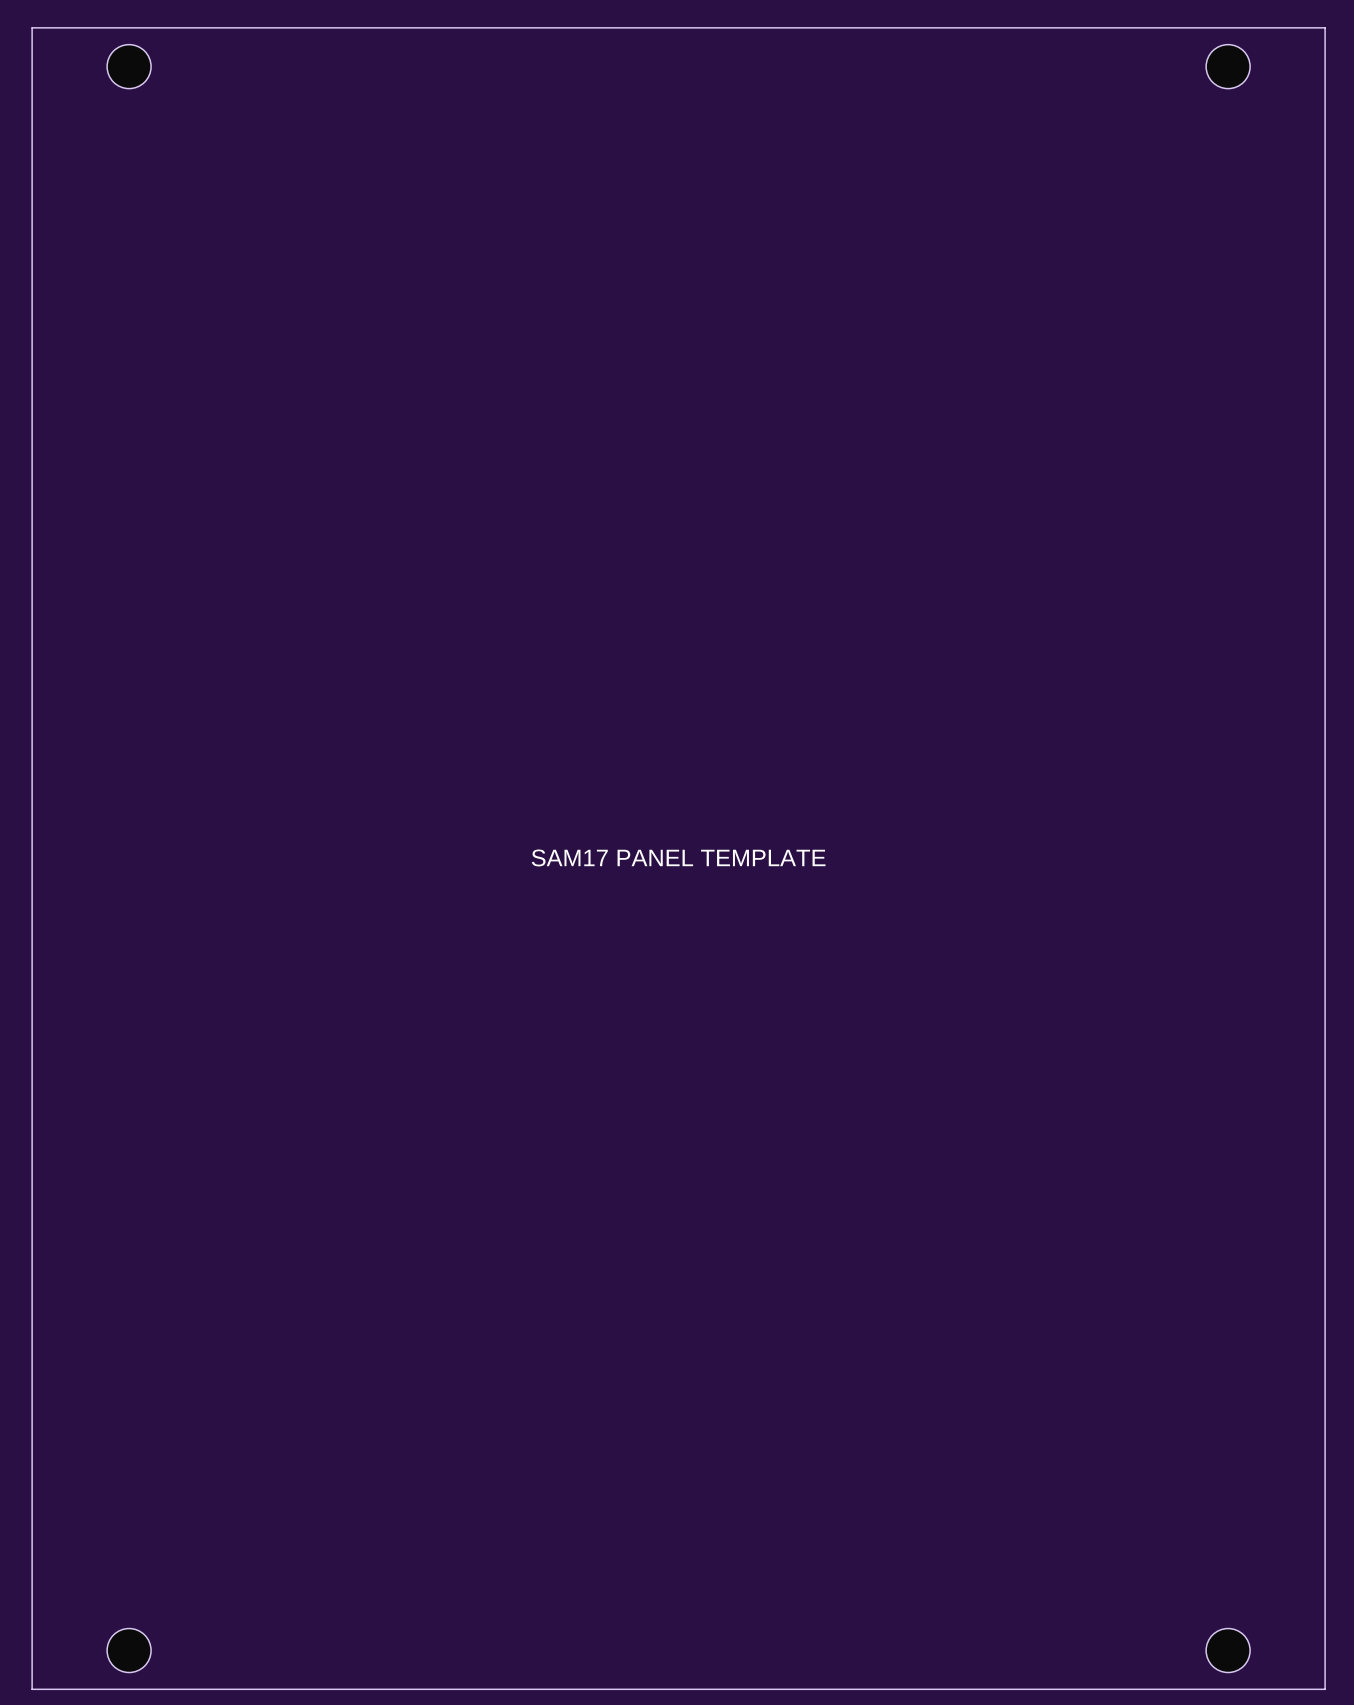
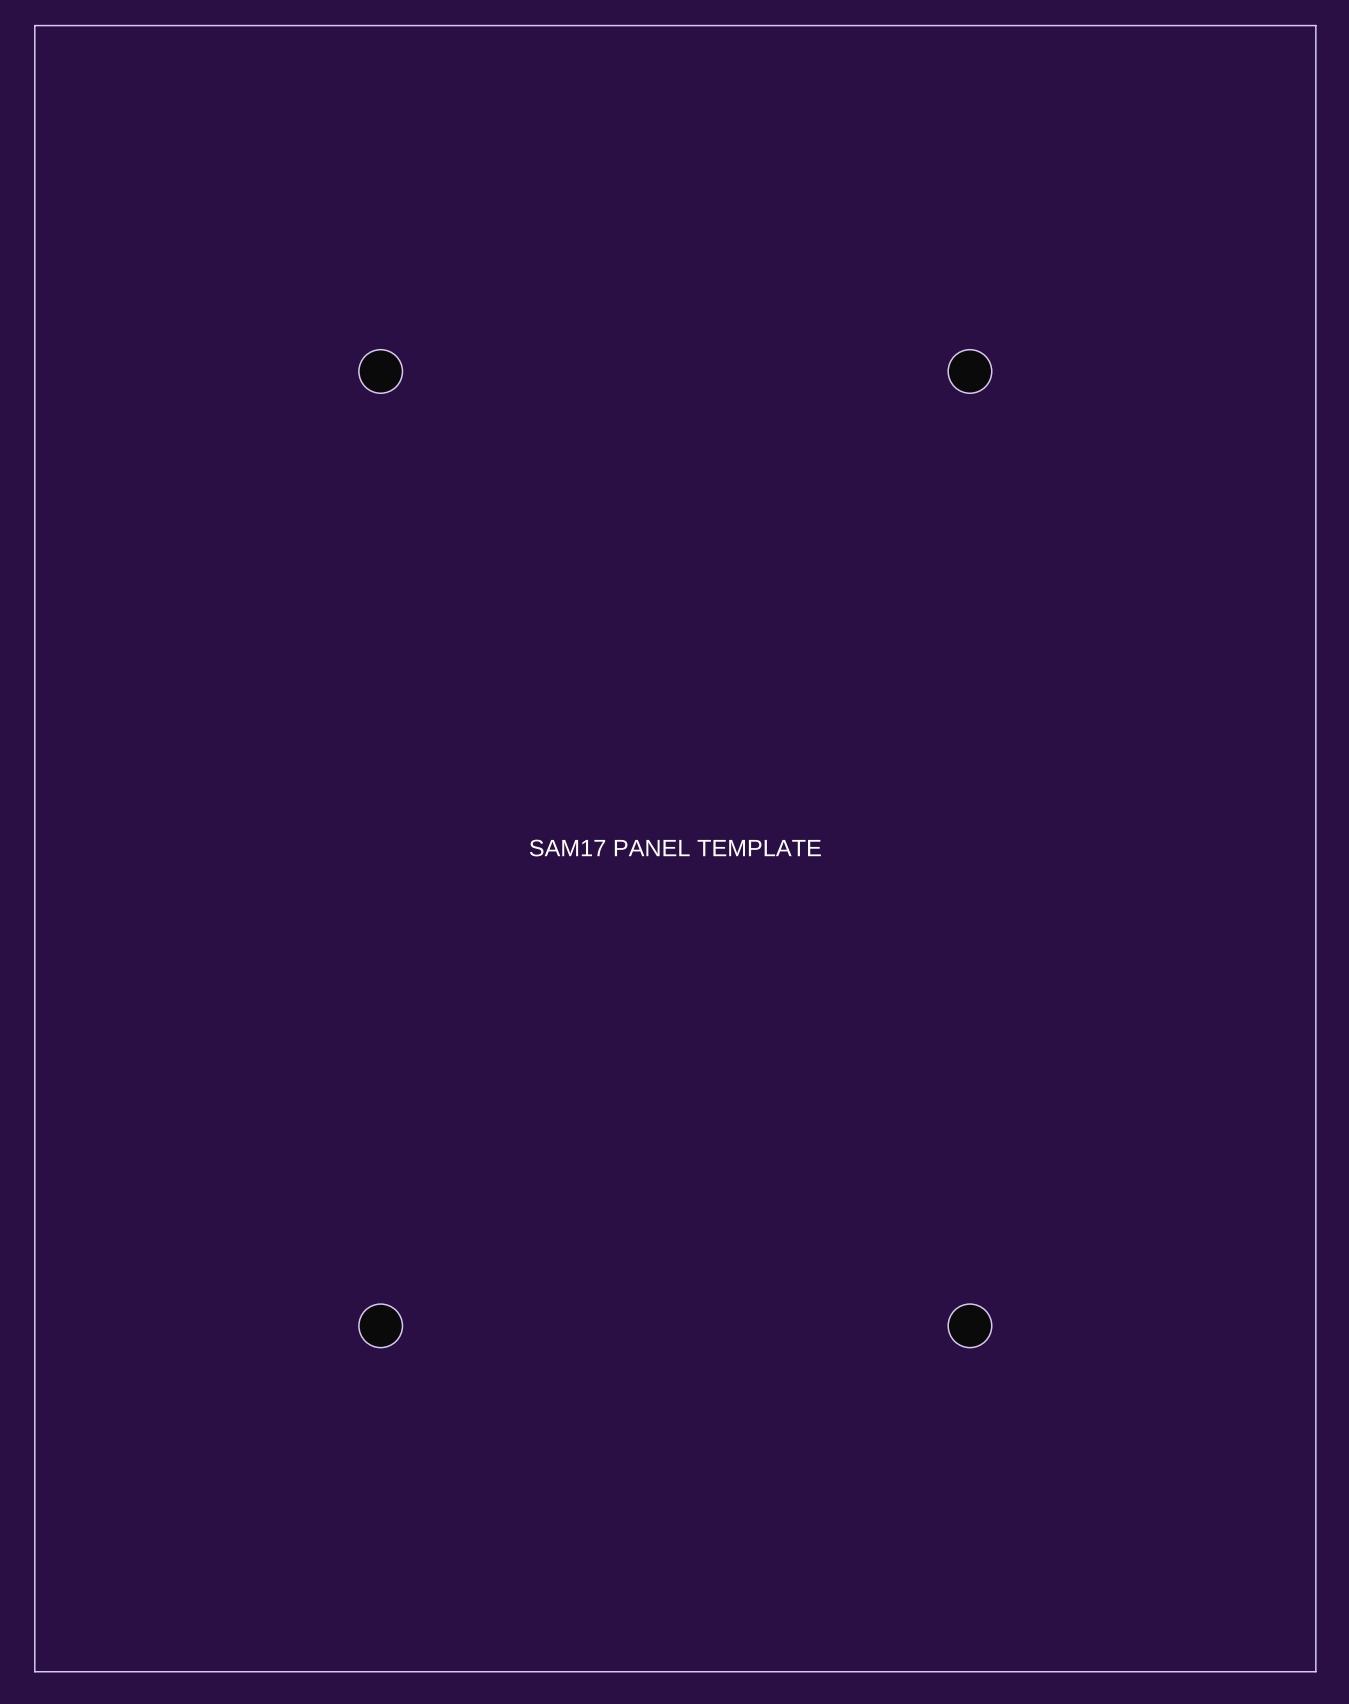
part: (129, 66) -> none
part: (1228, 66) -> none
part: none -> (380, 371)
part: none -> (969, 371)
part: none -> (380, 1325)
part: none -> (969, 1325)
part: (129, 1650) -> none
part: (1228, 1650) -> none

